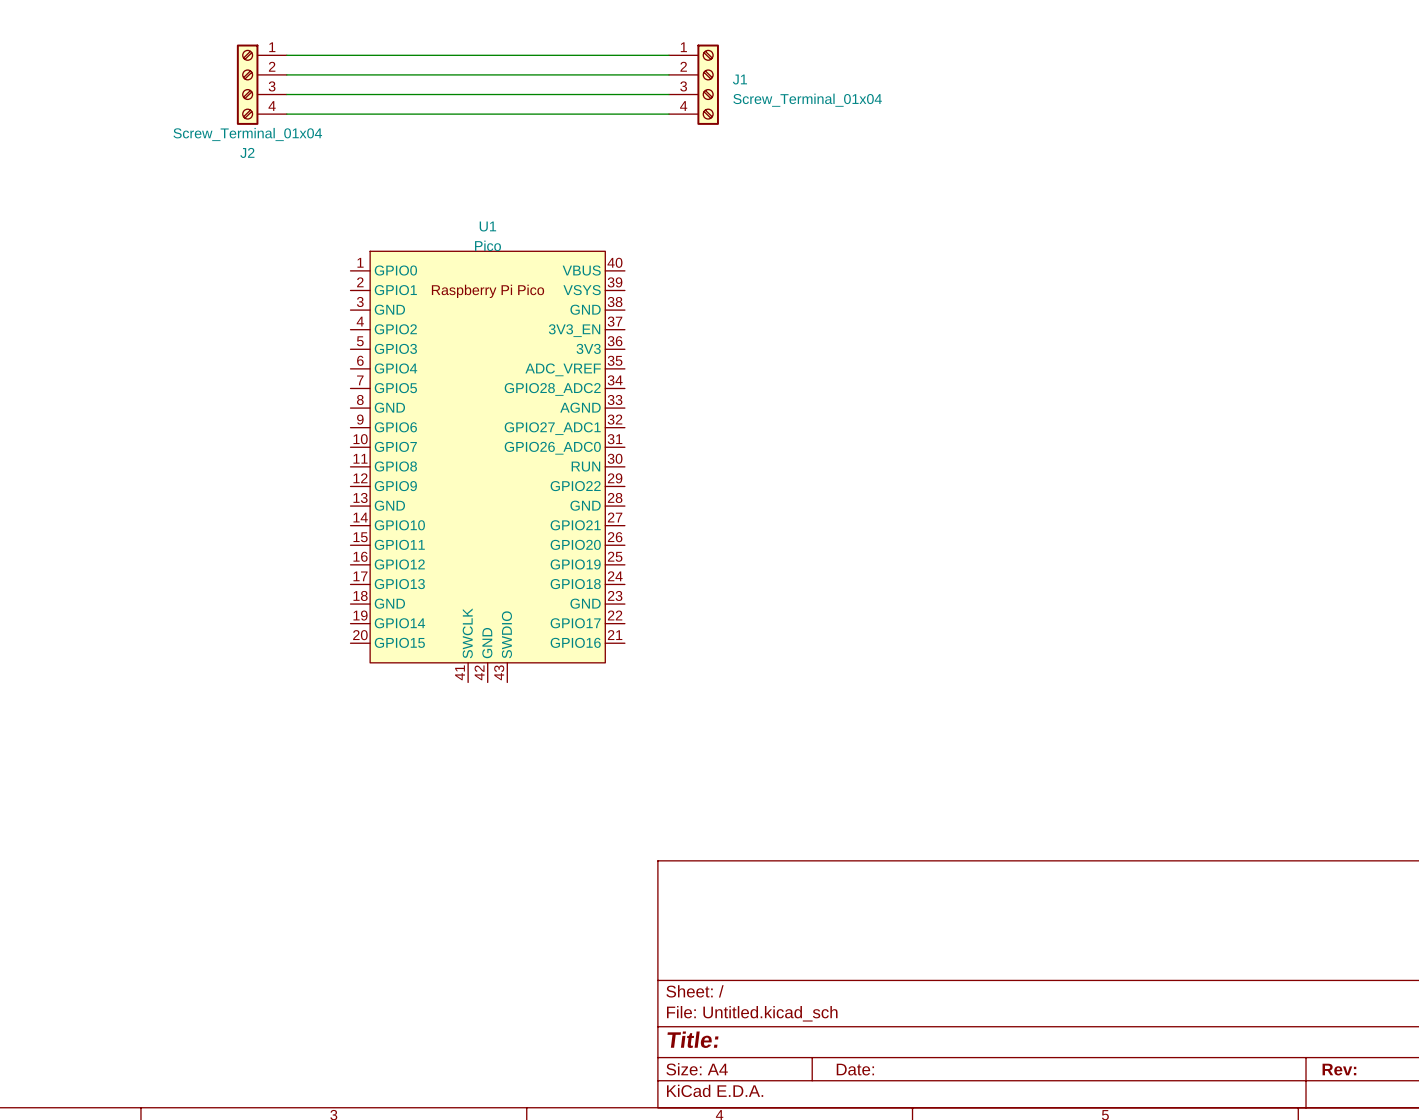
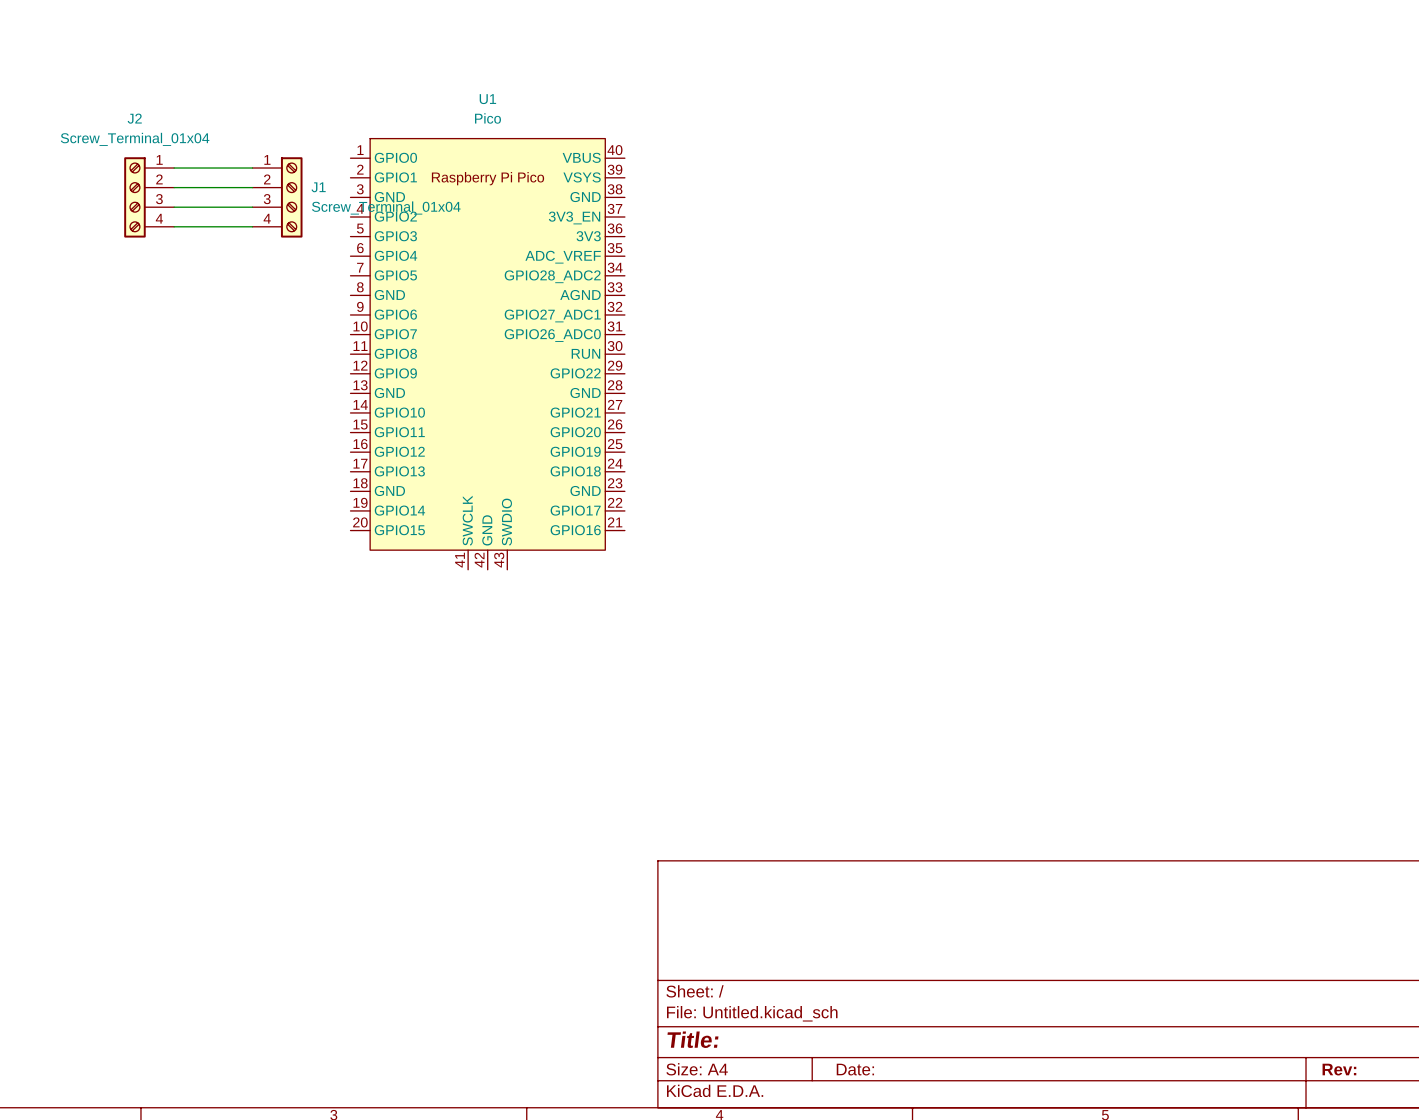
wire: (286, 55) (668, 55) -> none
wire: (286, 74) (668, 74) -> none
J1 name position: J1 (739, 79) -> J1 (318, 187)
J2 position: (261, 84) -> (149, 197)
J1 position: (693, 84) -> (277, 197)
wire: (286, 94) (668, 94) -> none
J1 value position: Screw_Terminal_01x04 (807, 100) -> Screw_Terminal_01x04 (386, 207)
wire: (286, 114) (668, 114) -> none
J2 value position: Screw_Terminal_01x04 (247, 134) -> Screw_Terminal_01x04 (135, 139)
J2 name position: J2 (247, 152) -> J2 (134, 118)
wire: none -> (174, 168) (252, 168)
wire: none -> (174, 187) (252, 187)
wire: none -> (174, 207) (252, 207)
wire: none -> (174, 226) (252, 226)
U1 name position: U1 (487, 226) -> U1 (487, 99)
U1 value position: Pico (487, 245) -> Pico (487, 118)
U1 position: (487, 466) -> (487, 354)

